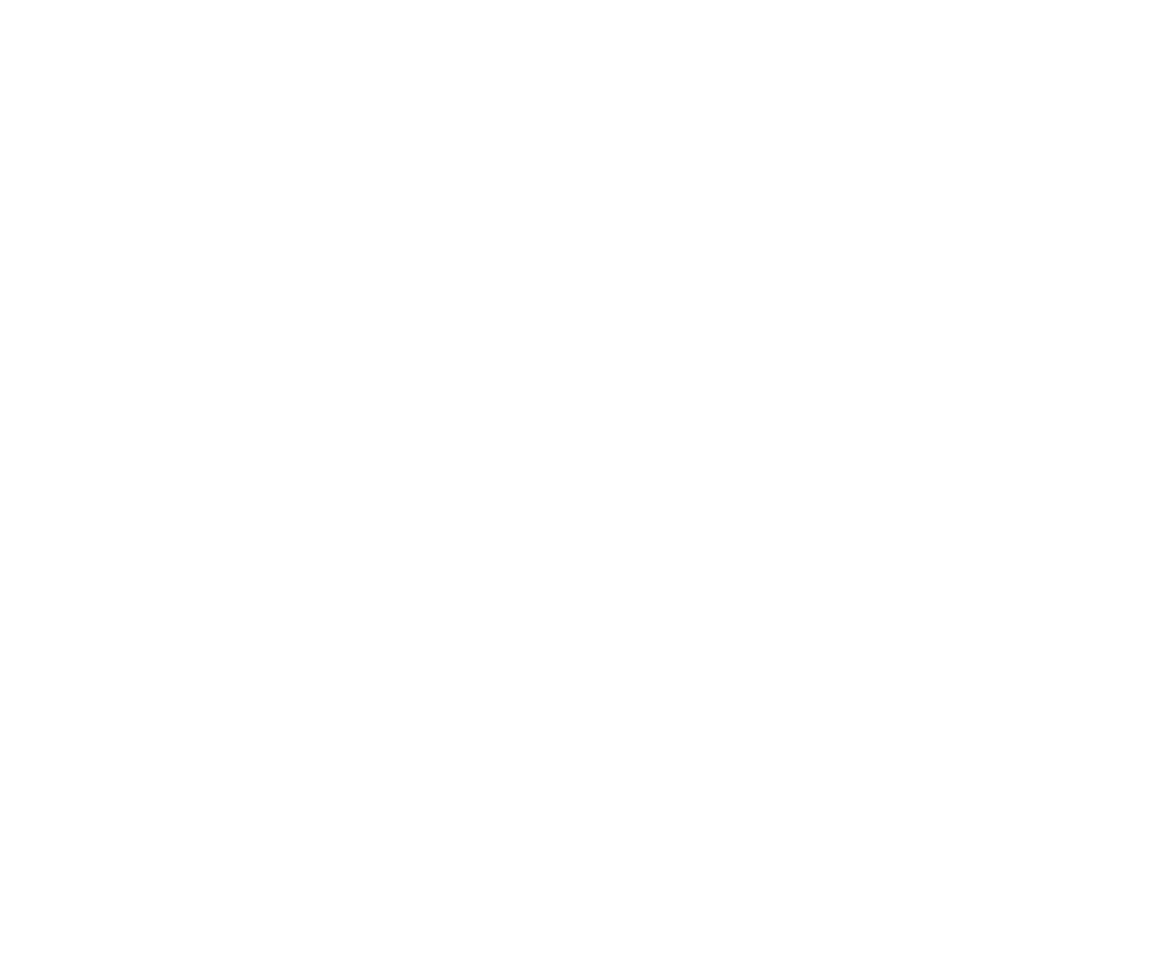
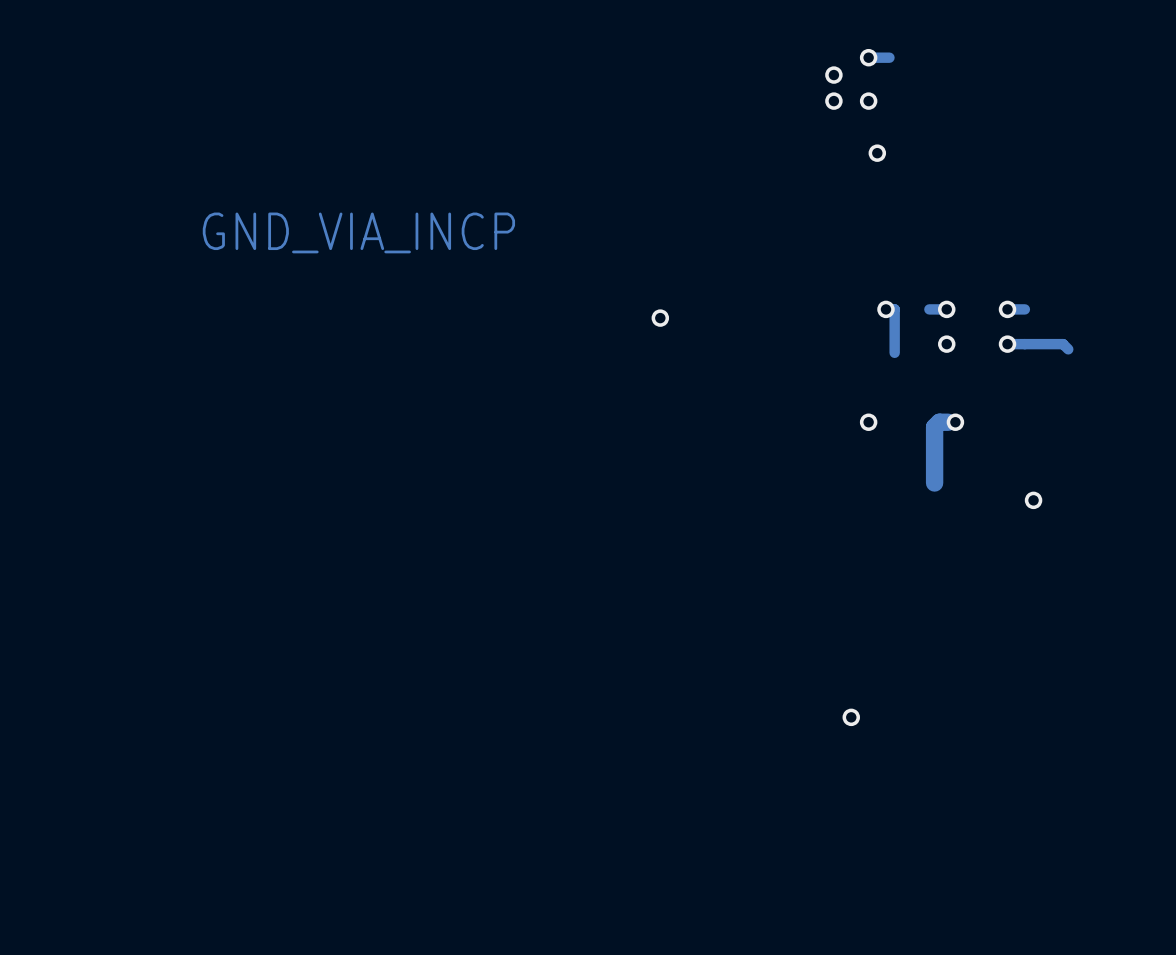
via: none -> (868, 57)
track: none -> (889, 57) (868, 57)
via: none -> (833, 75)
via: none -> (833, 101)
via: none -> (868, 101)
via: none -> (877, 153)
text: none -> GND_VIA_INCP (358, 232)
track: none -> (885, 309) (894, 309) (894, 352)
via: none -> (885, 309)
track: none -> (946, 309) (929, 309)
via: none -> (946, 309)
via: none -> (1007, 309)
track: none -> (1024, 309) (1007, 309)
via: none -> (660, 318)
via: none -> (946, 344)
track: none -> (1007, 344) (1063, 344) (1068, 349)
via: none -> (1007, 344)
via: none -> (868, 422)
track: none -> (955, 422) (939, 422) (934, 427) (934, 483)
via: none -> (955, 422)
via: none -> (1033, 500)
via: none -> (851, 717)

